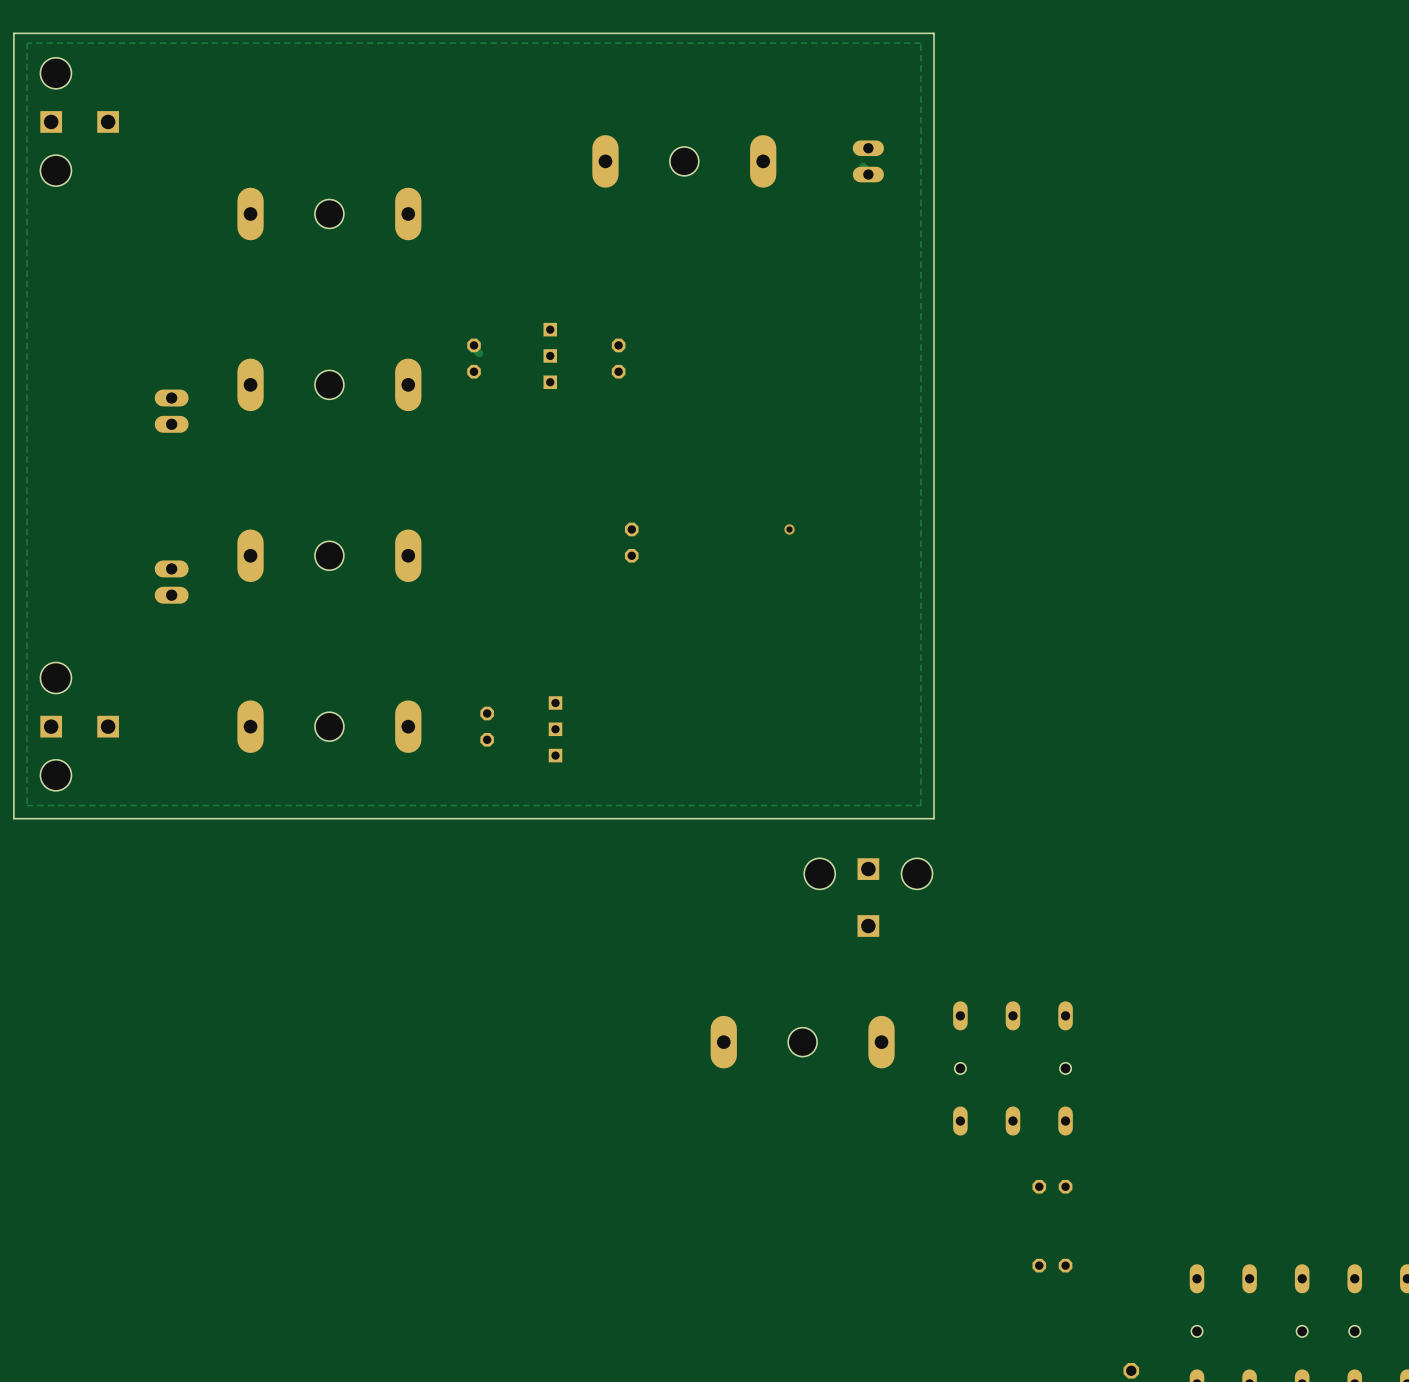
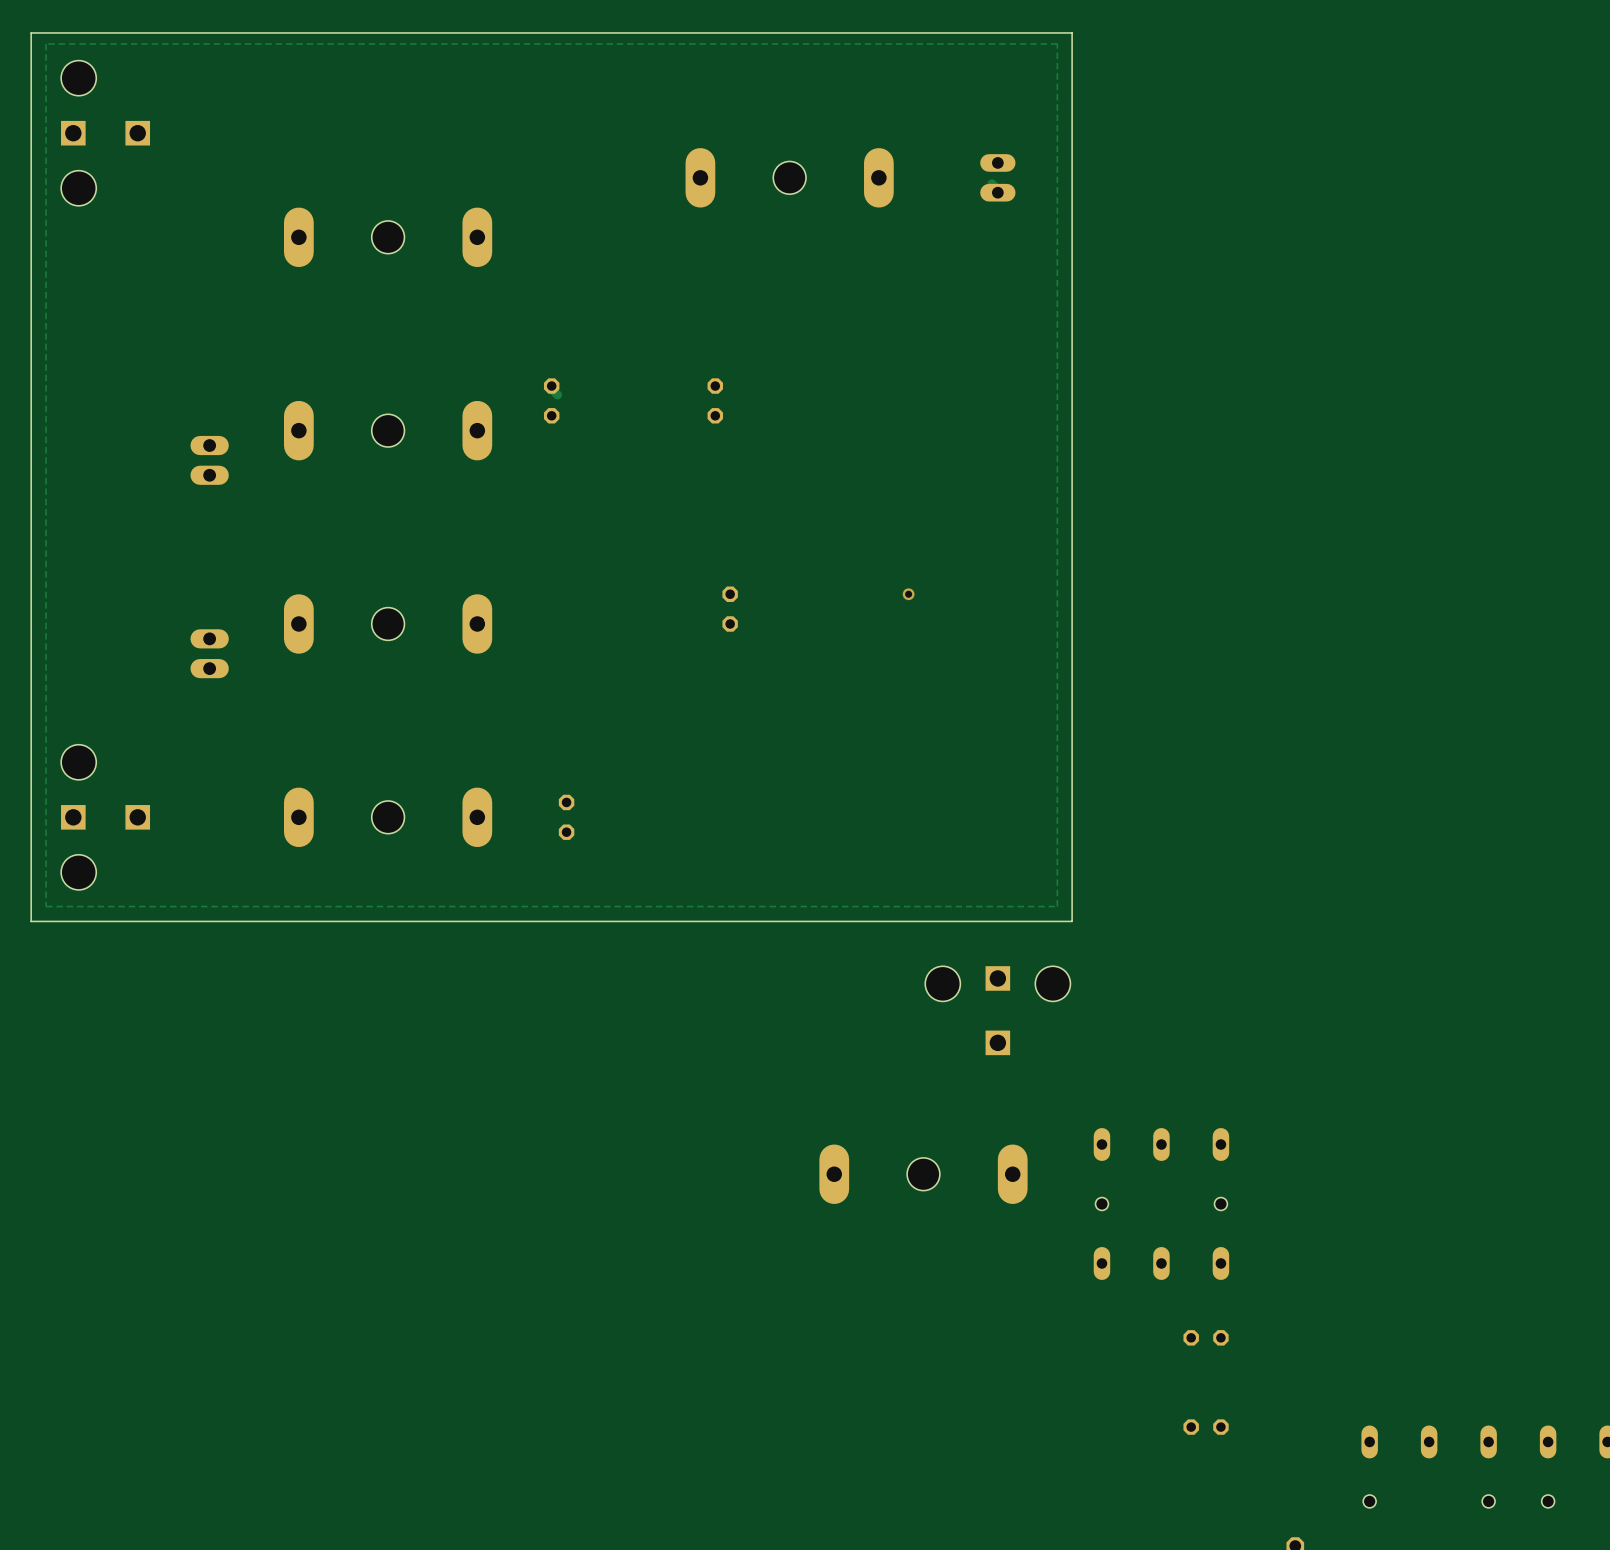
part: (550, 355) -> none
part: (555, 729) -> none

